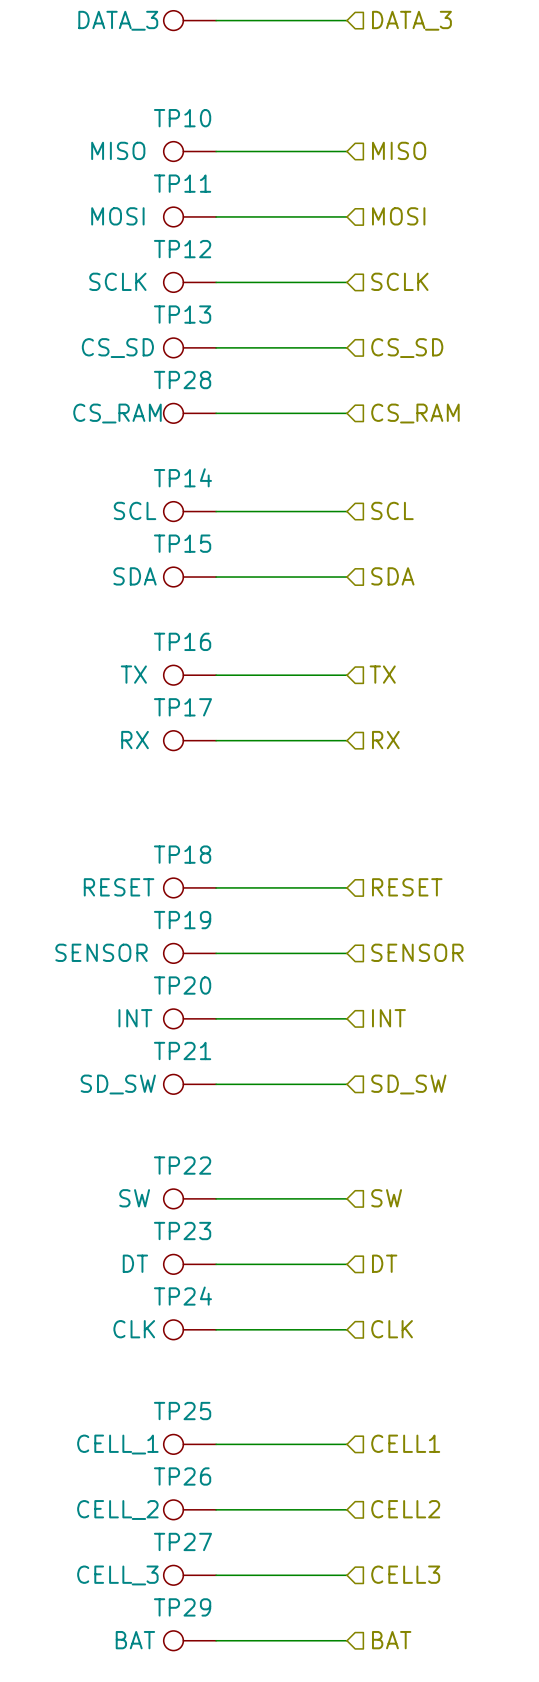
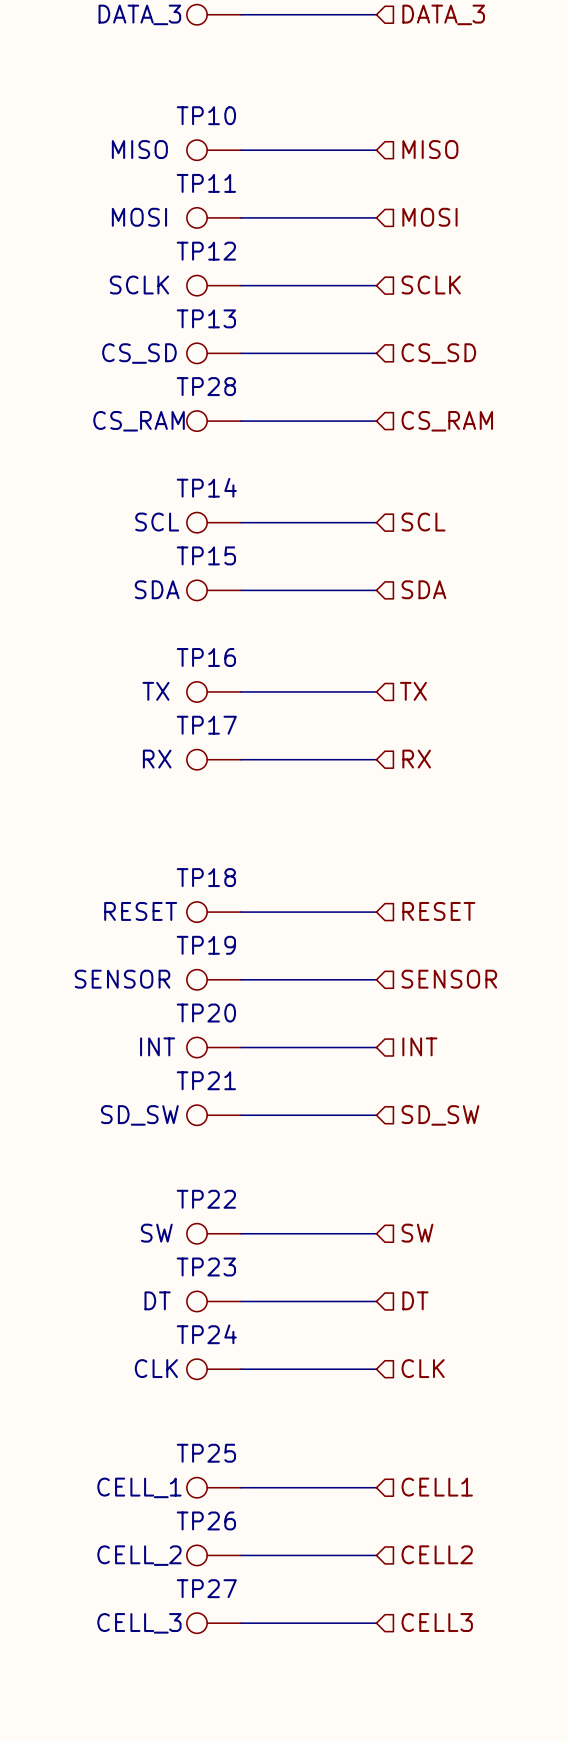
TP29: BAT (189, 1640) -> none
wire: (216, 1640) (347, 1640) -> none
hierarchical label: BAT (391, 1640) -> none

